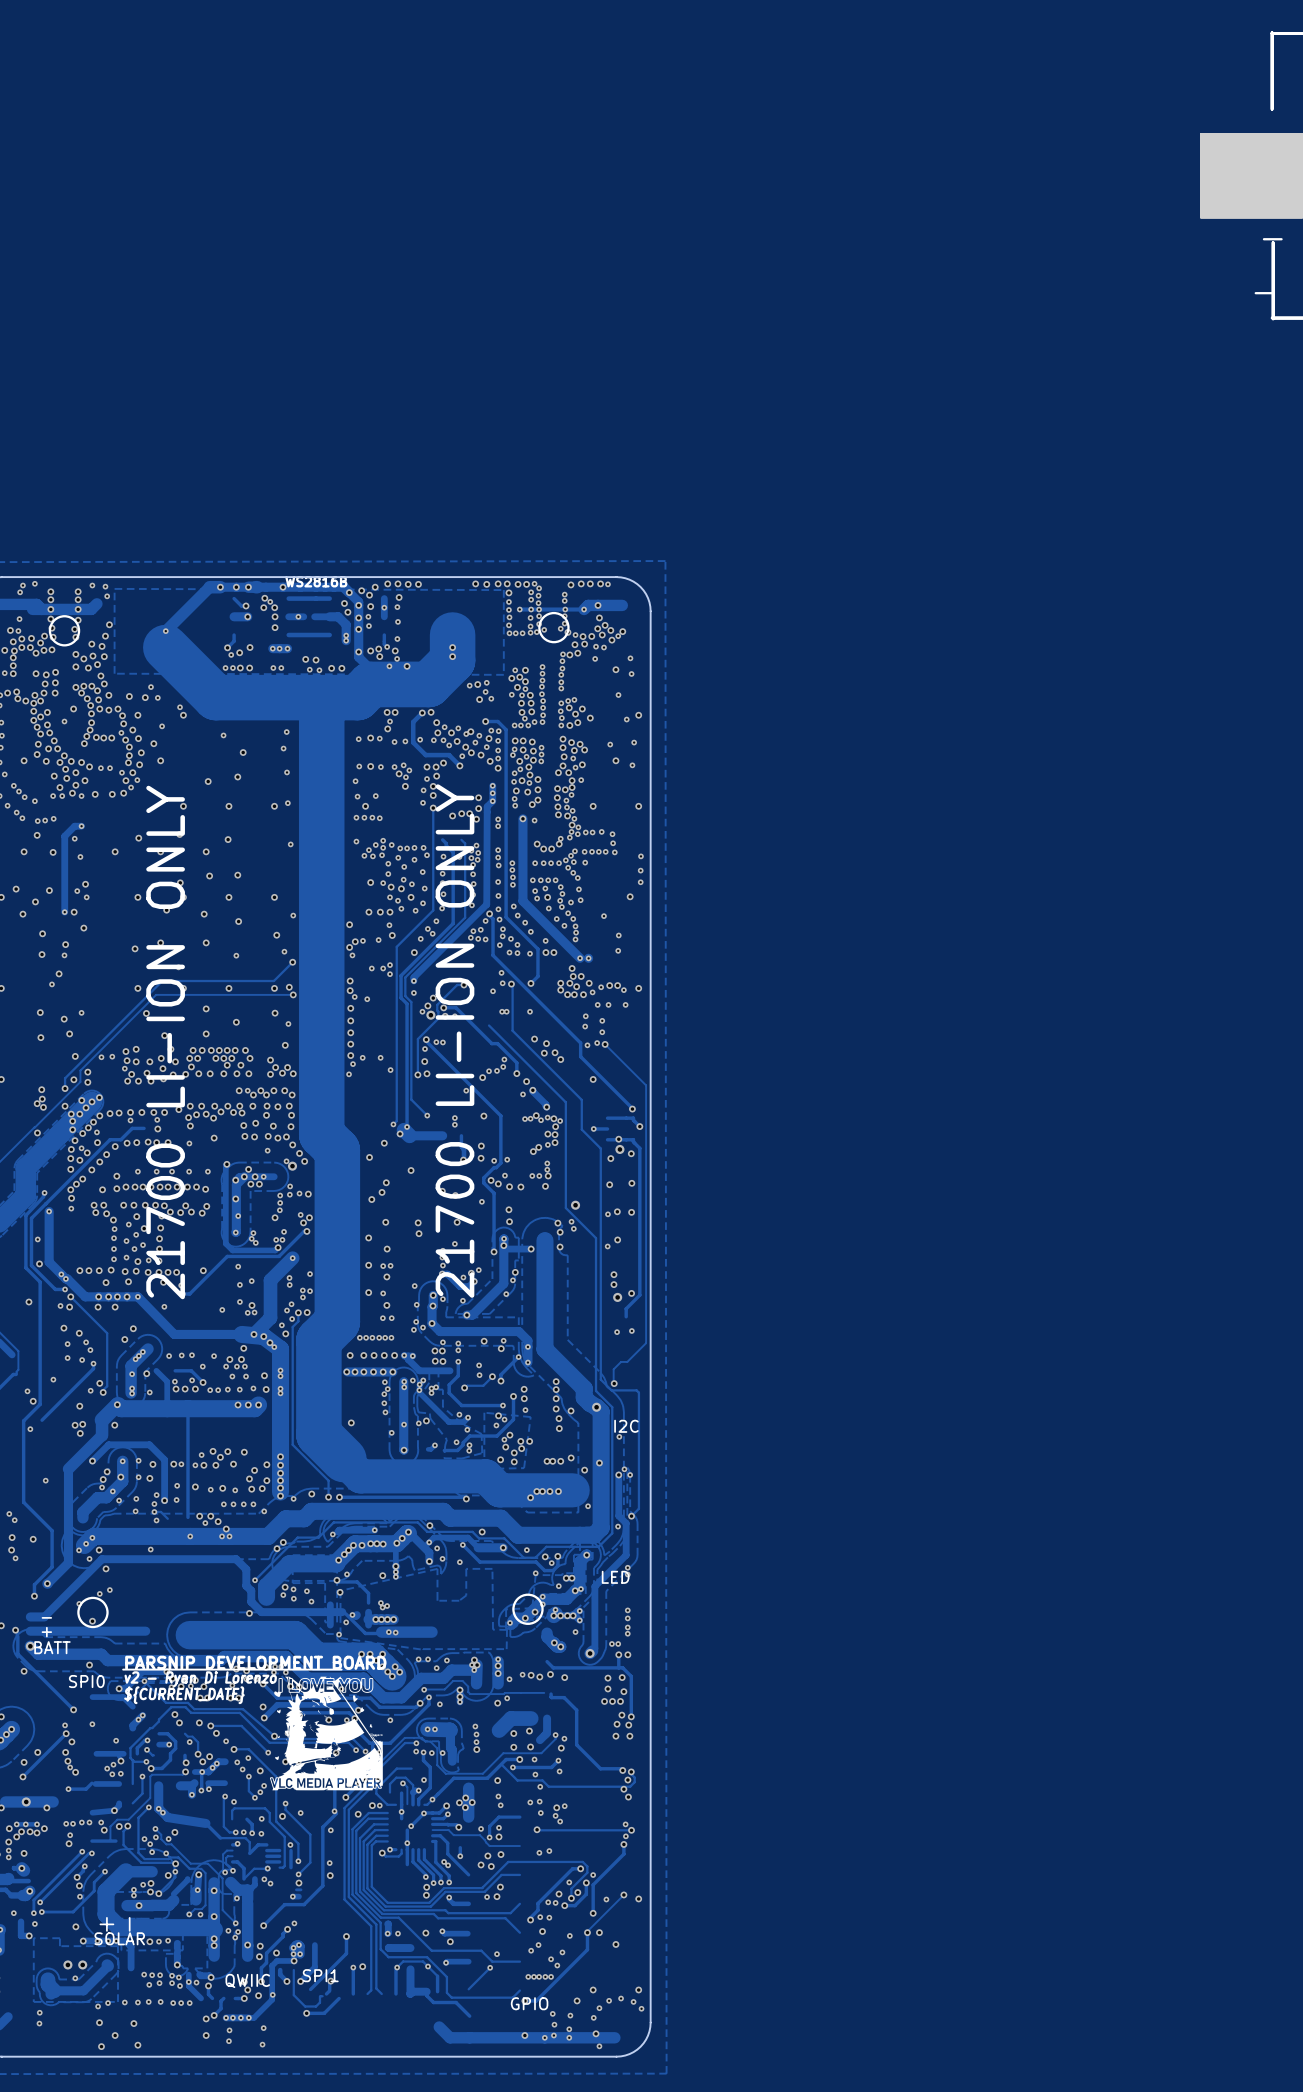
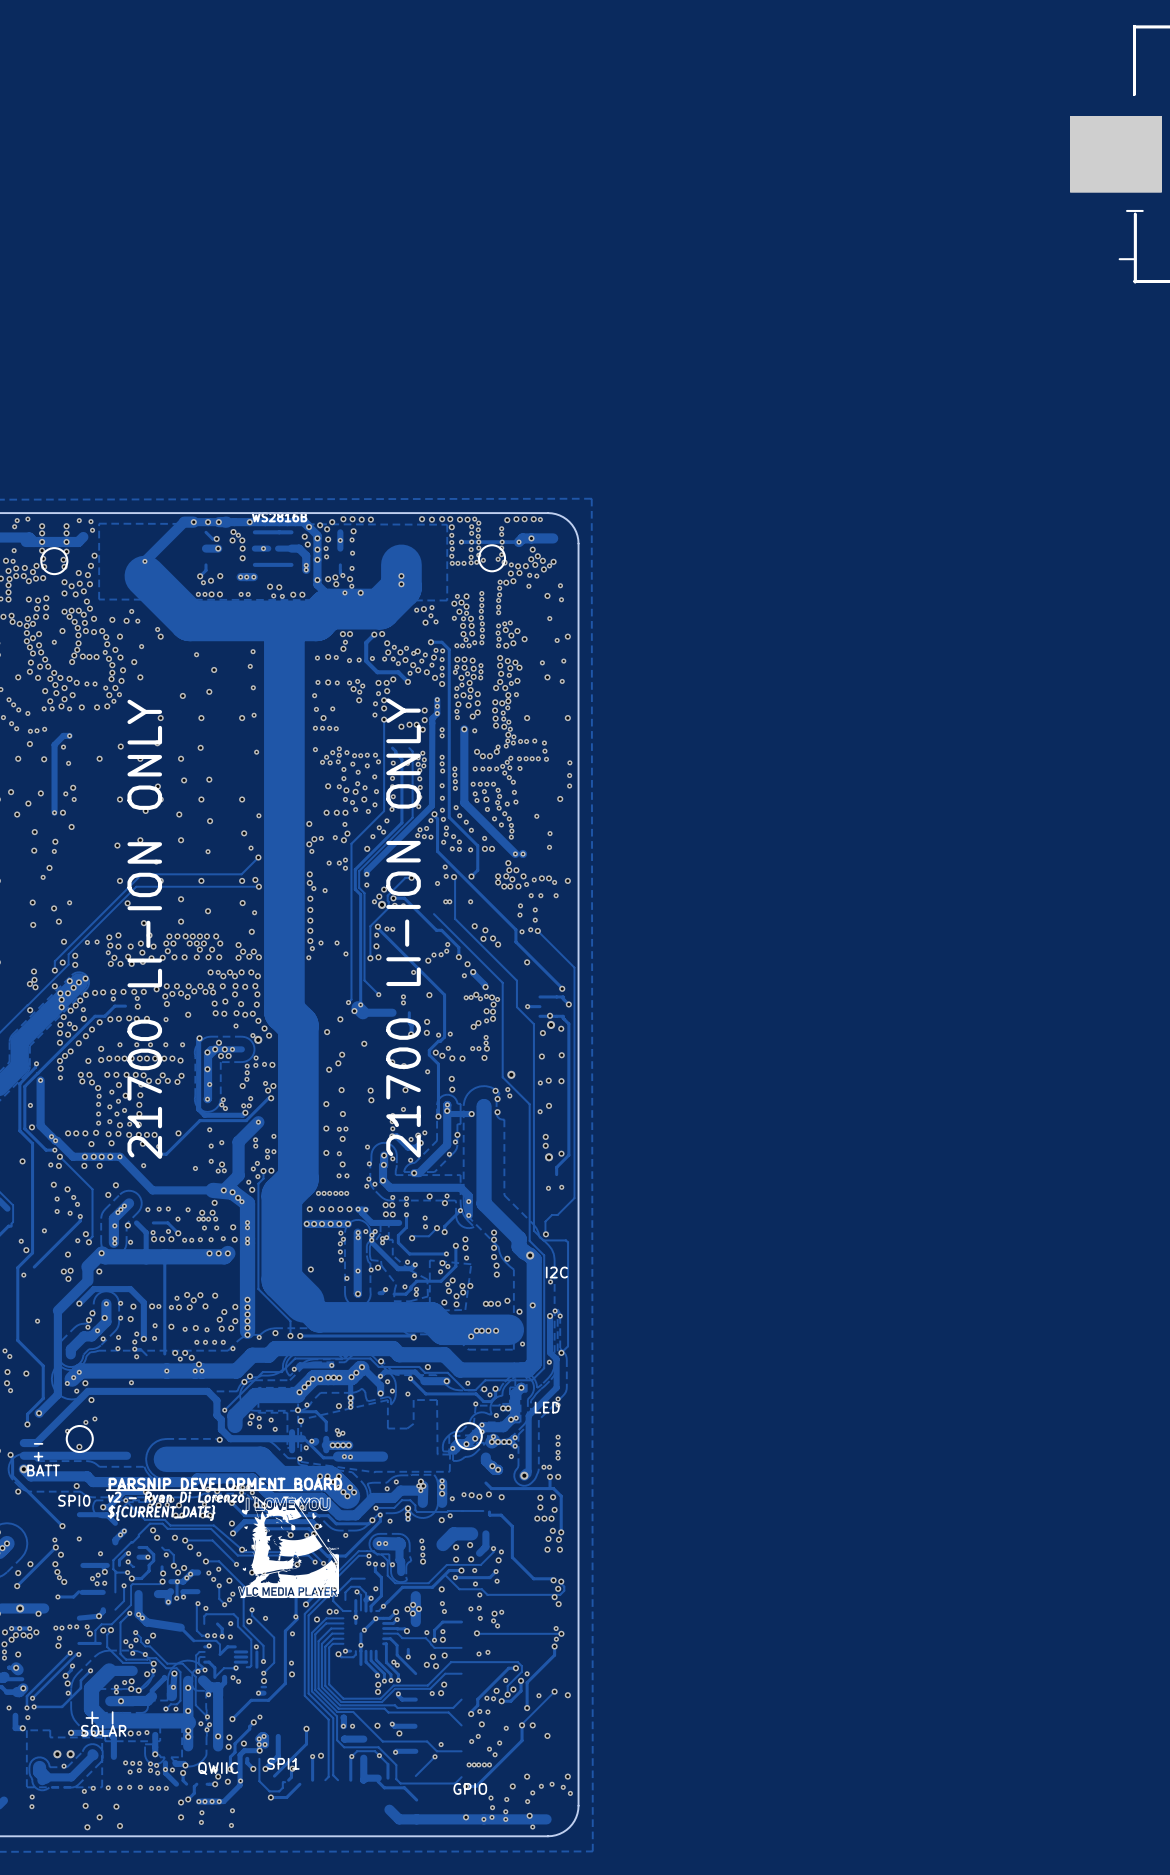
via: none -> (343, 840)
via: none -> (203, 1219)
via: (418, 1659) -> none
via: (428, 1659) -> none
via: (75, 1926) -> none

